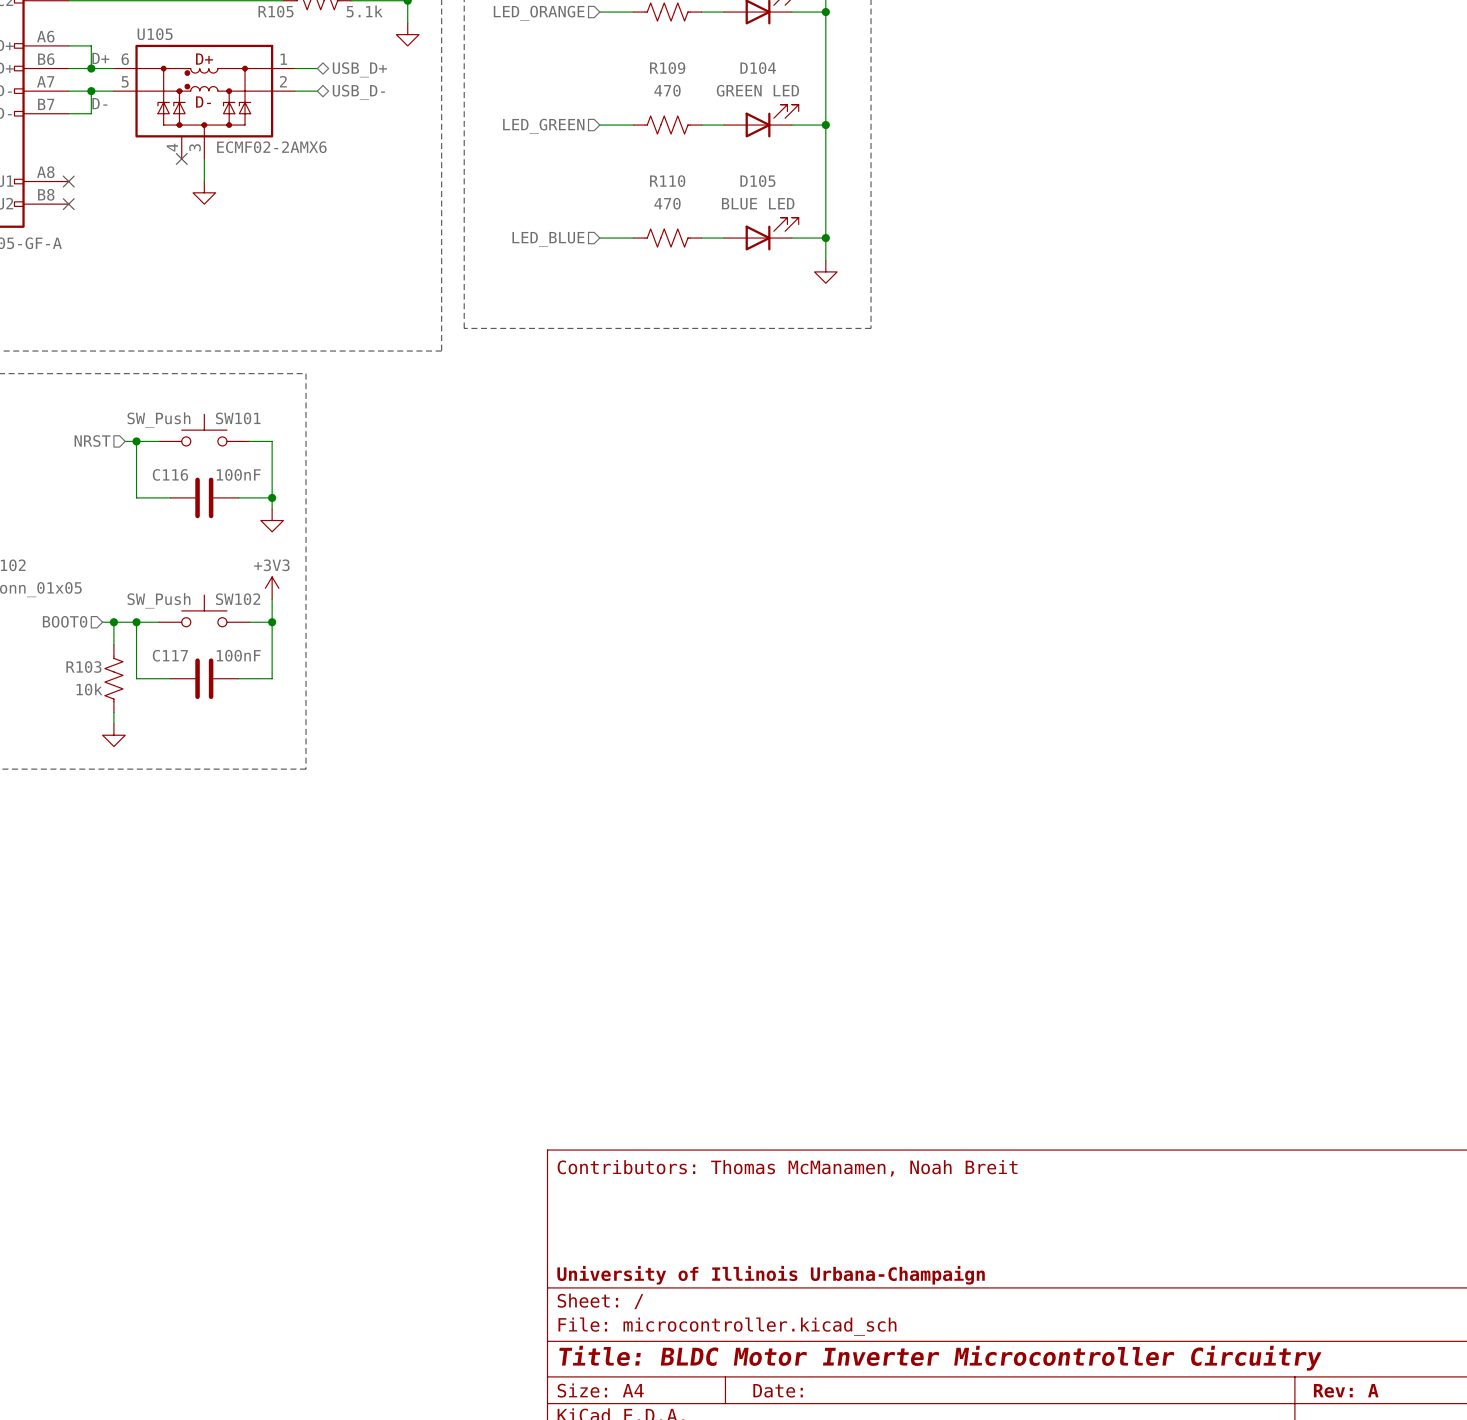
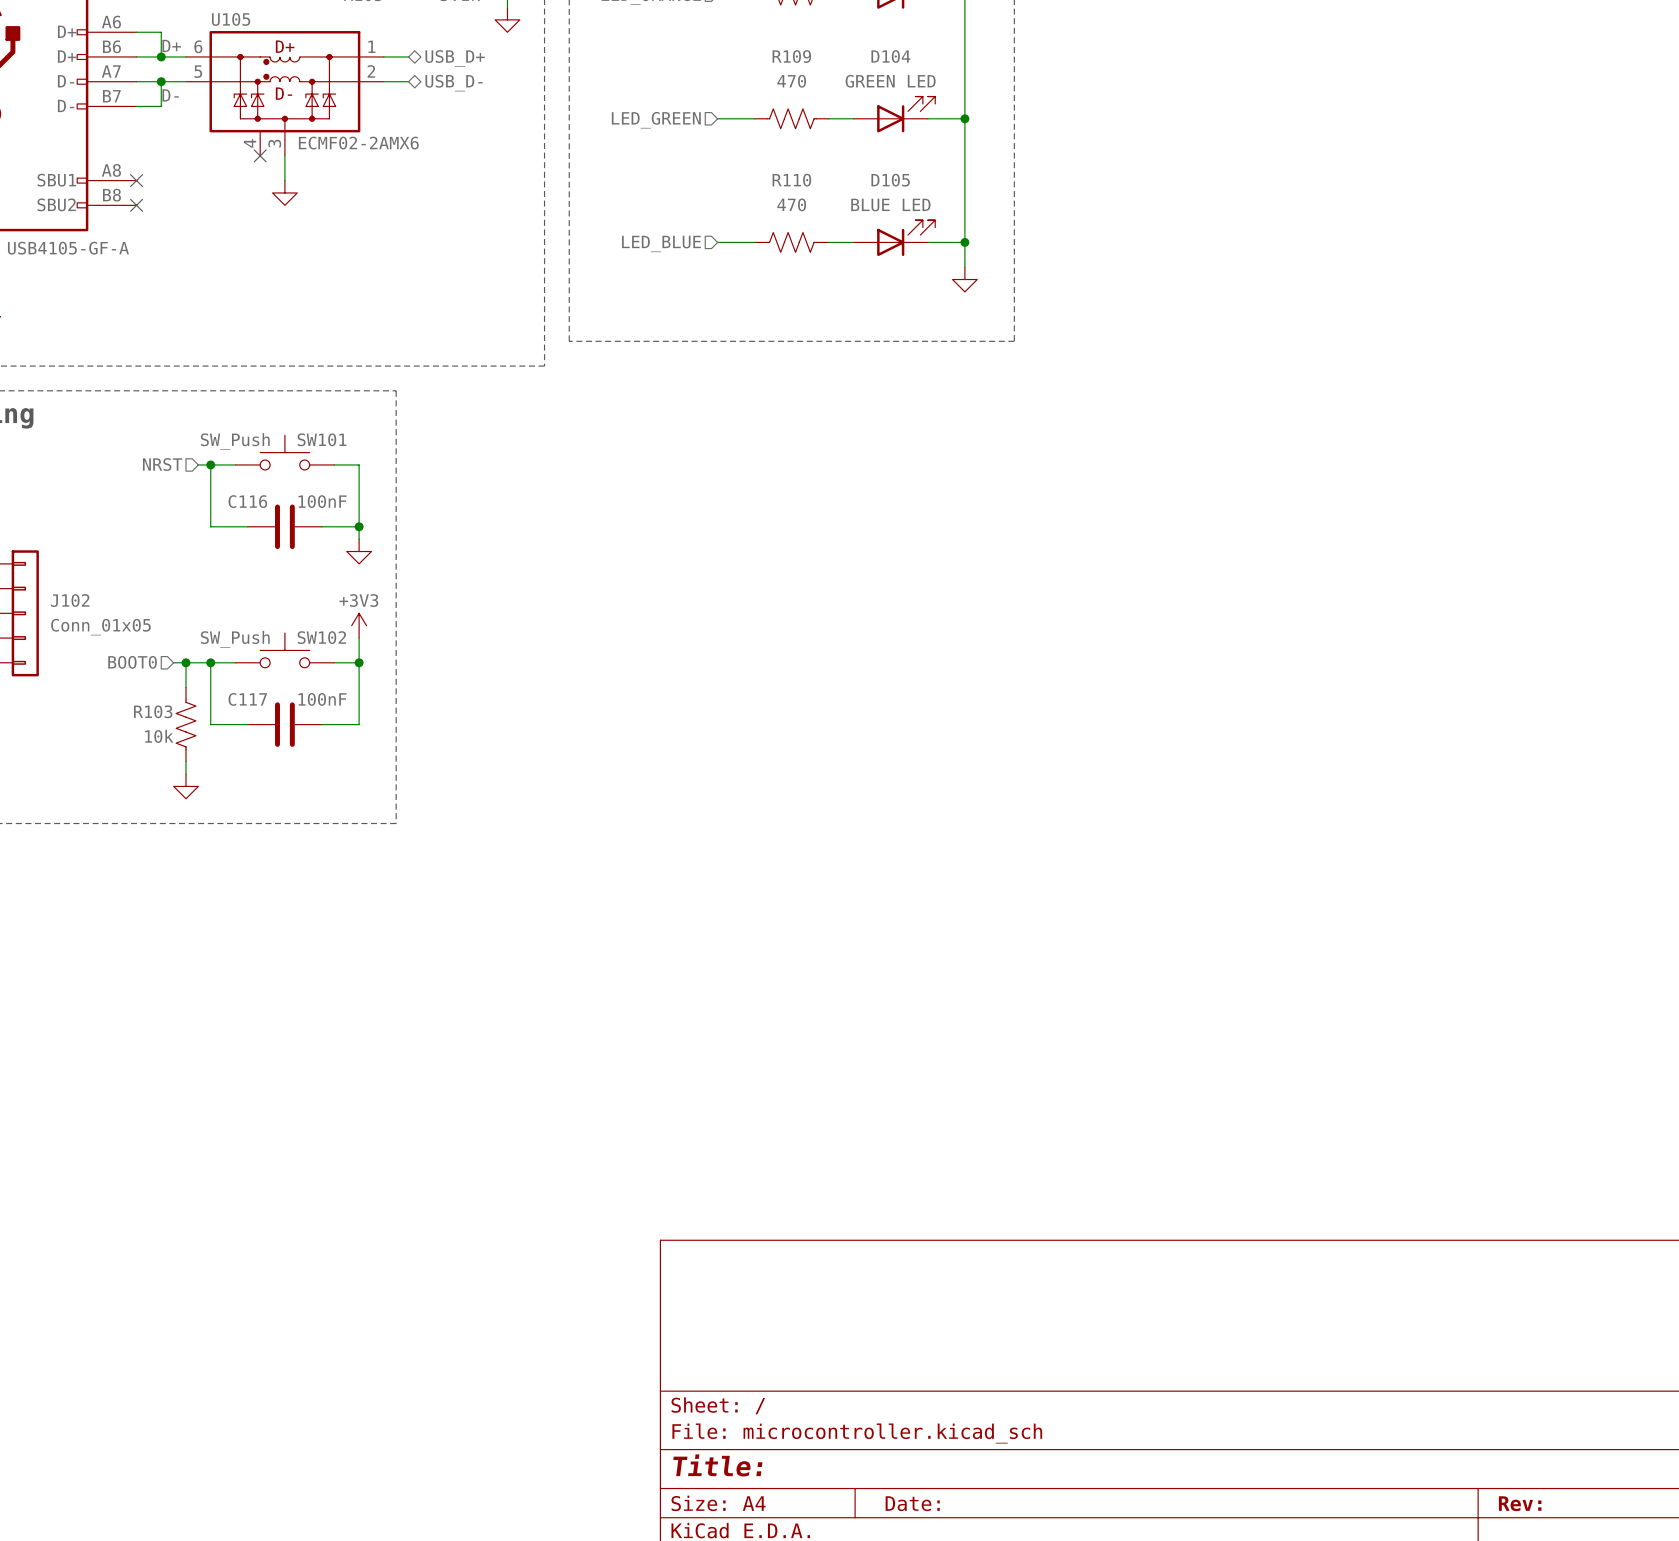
title block: Contributors: Thomas McManamen, Noah Breit (787, 1168) -> none
title block: University of Illinois Urbana-Champaign (771, 1275) -> none
title block: Title: BLDC Motor Inverter Microcontroller Circuitry (940, 1358) -> Title: (717, 1465)
title block: Rev: A (1346, 1390) -> Rev: (1520, 1503)

